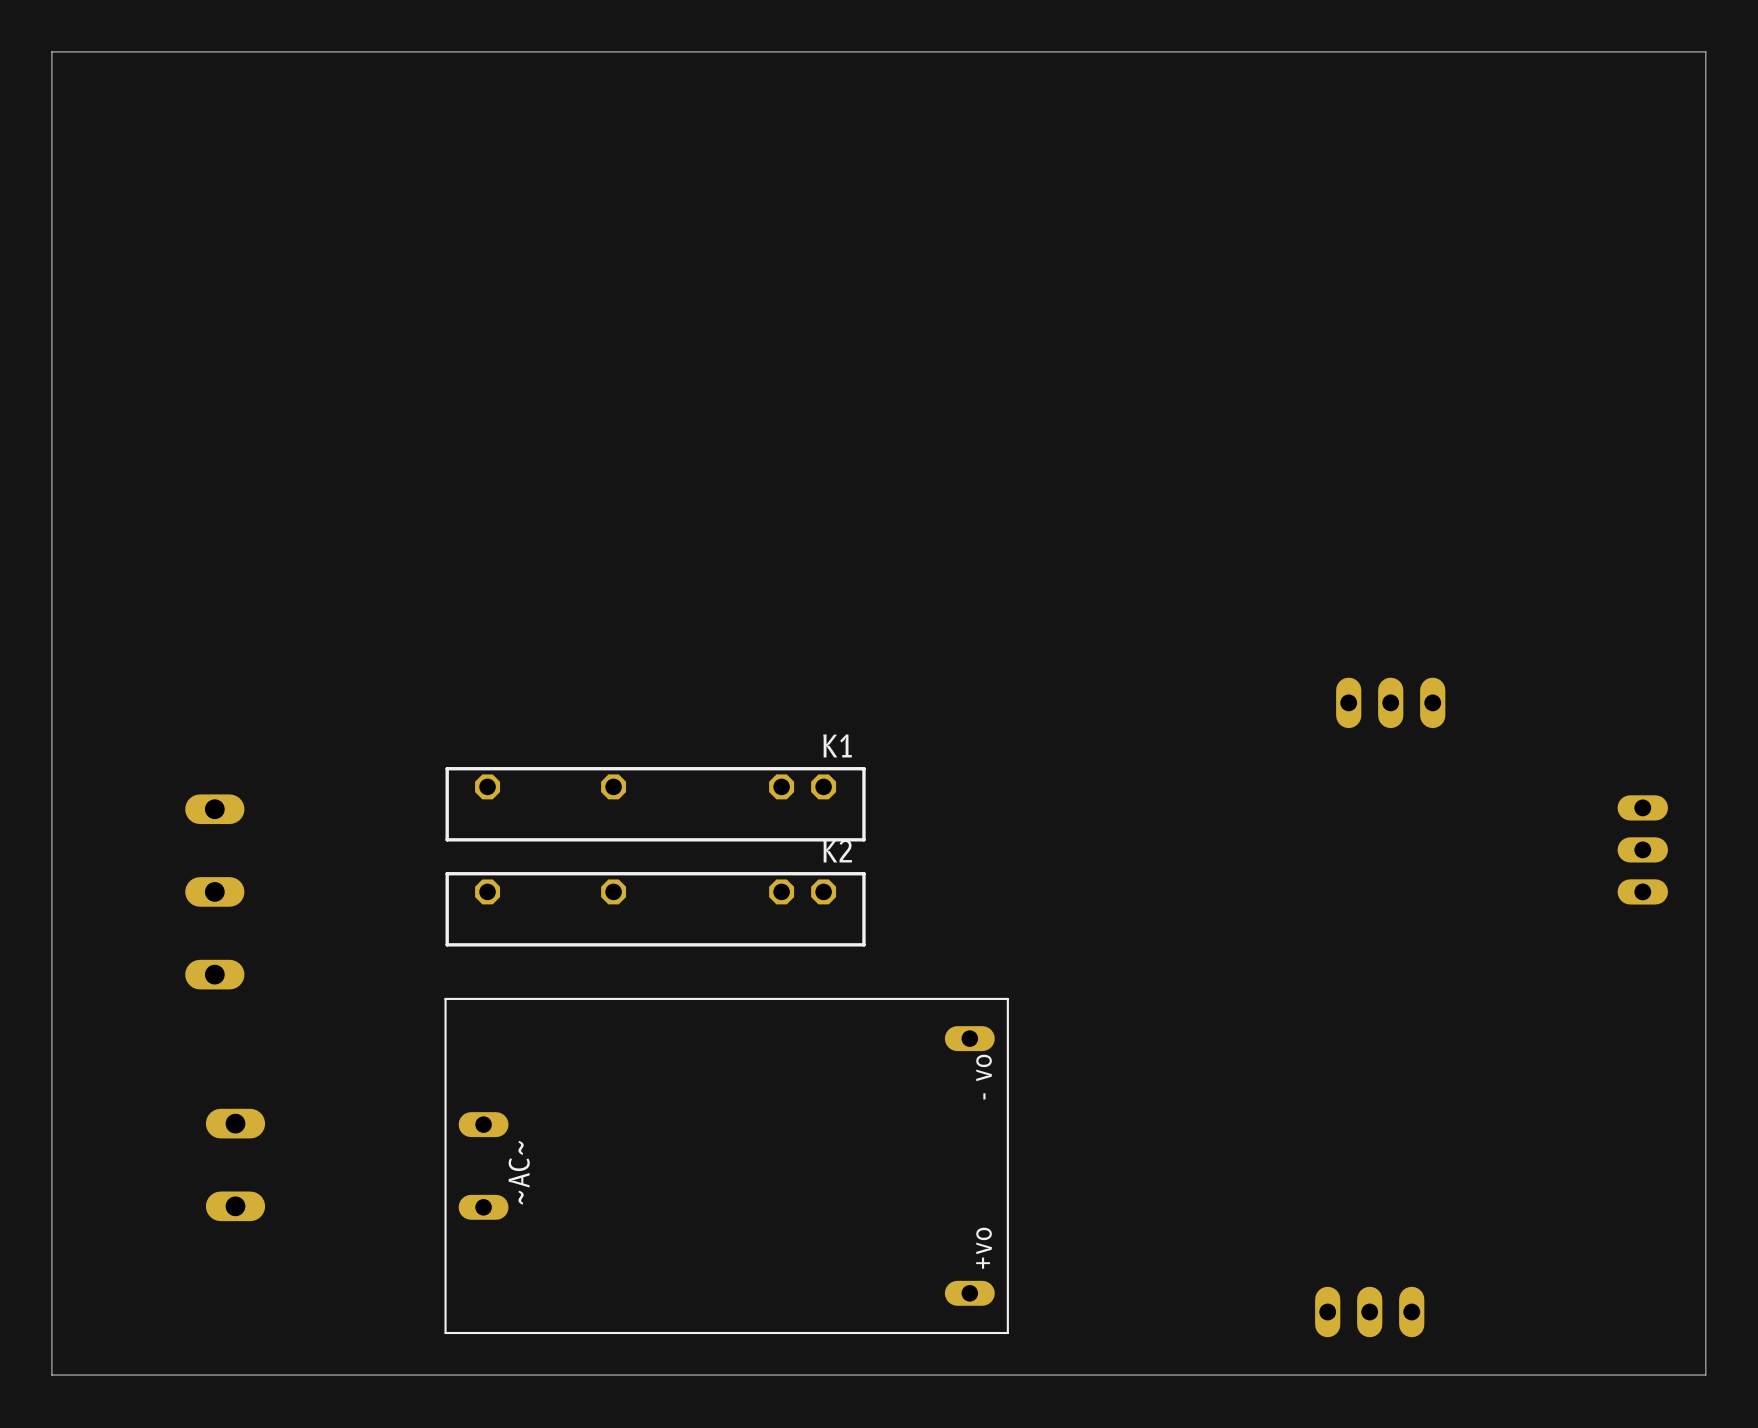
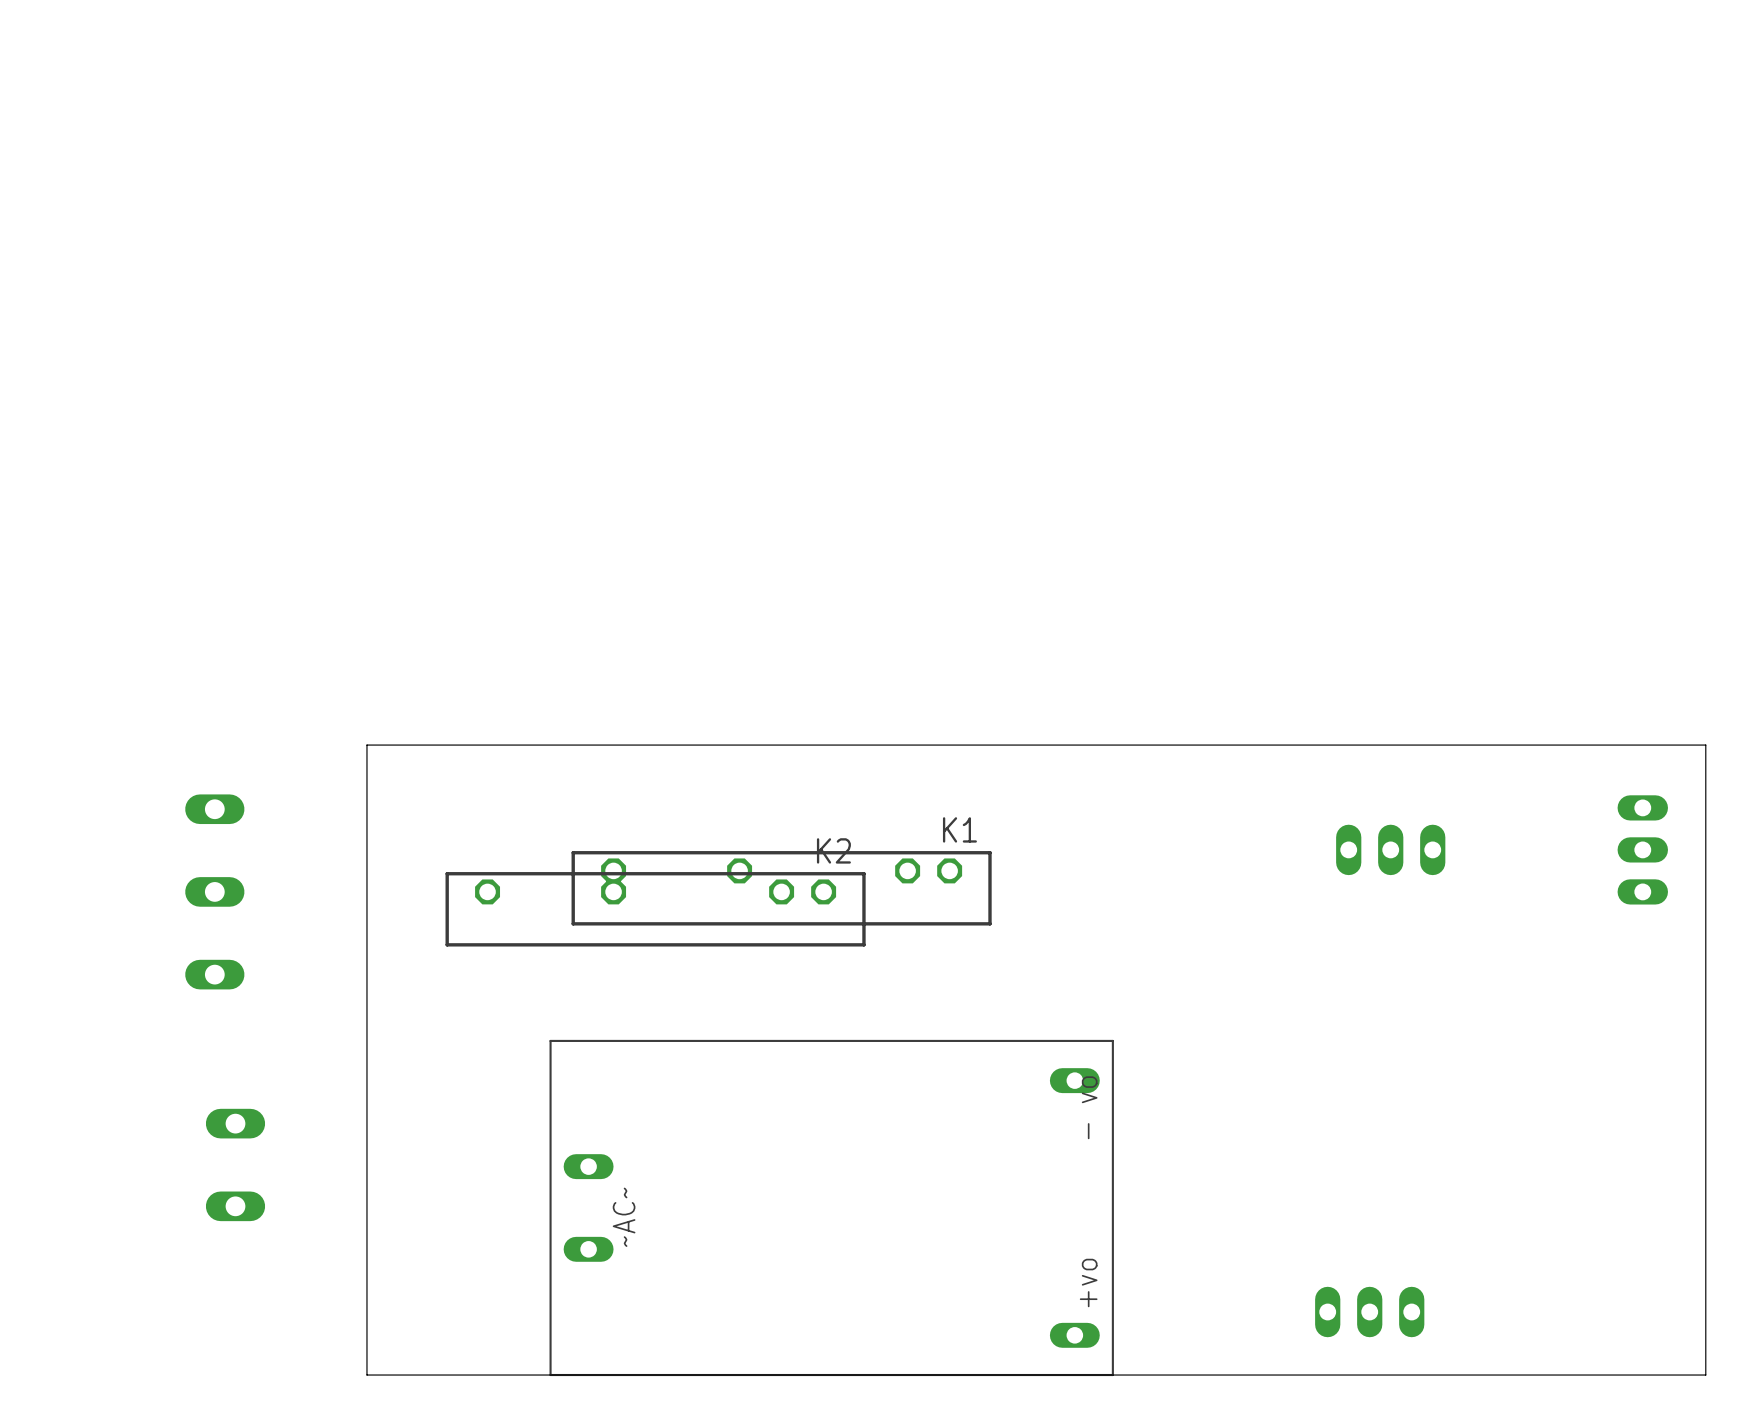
part position: (1390, 702) -> (1390, 849)
board edge: (1705, 745) (1705, 51) (51, 51) (51, 1375) (366, 1375) -> (1705, 745) (366, 745) (366, 1375)
K1 position: (655, 804) -> (781, 888)
part position: (726, 1165) -> (831, 1207)

